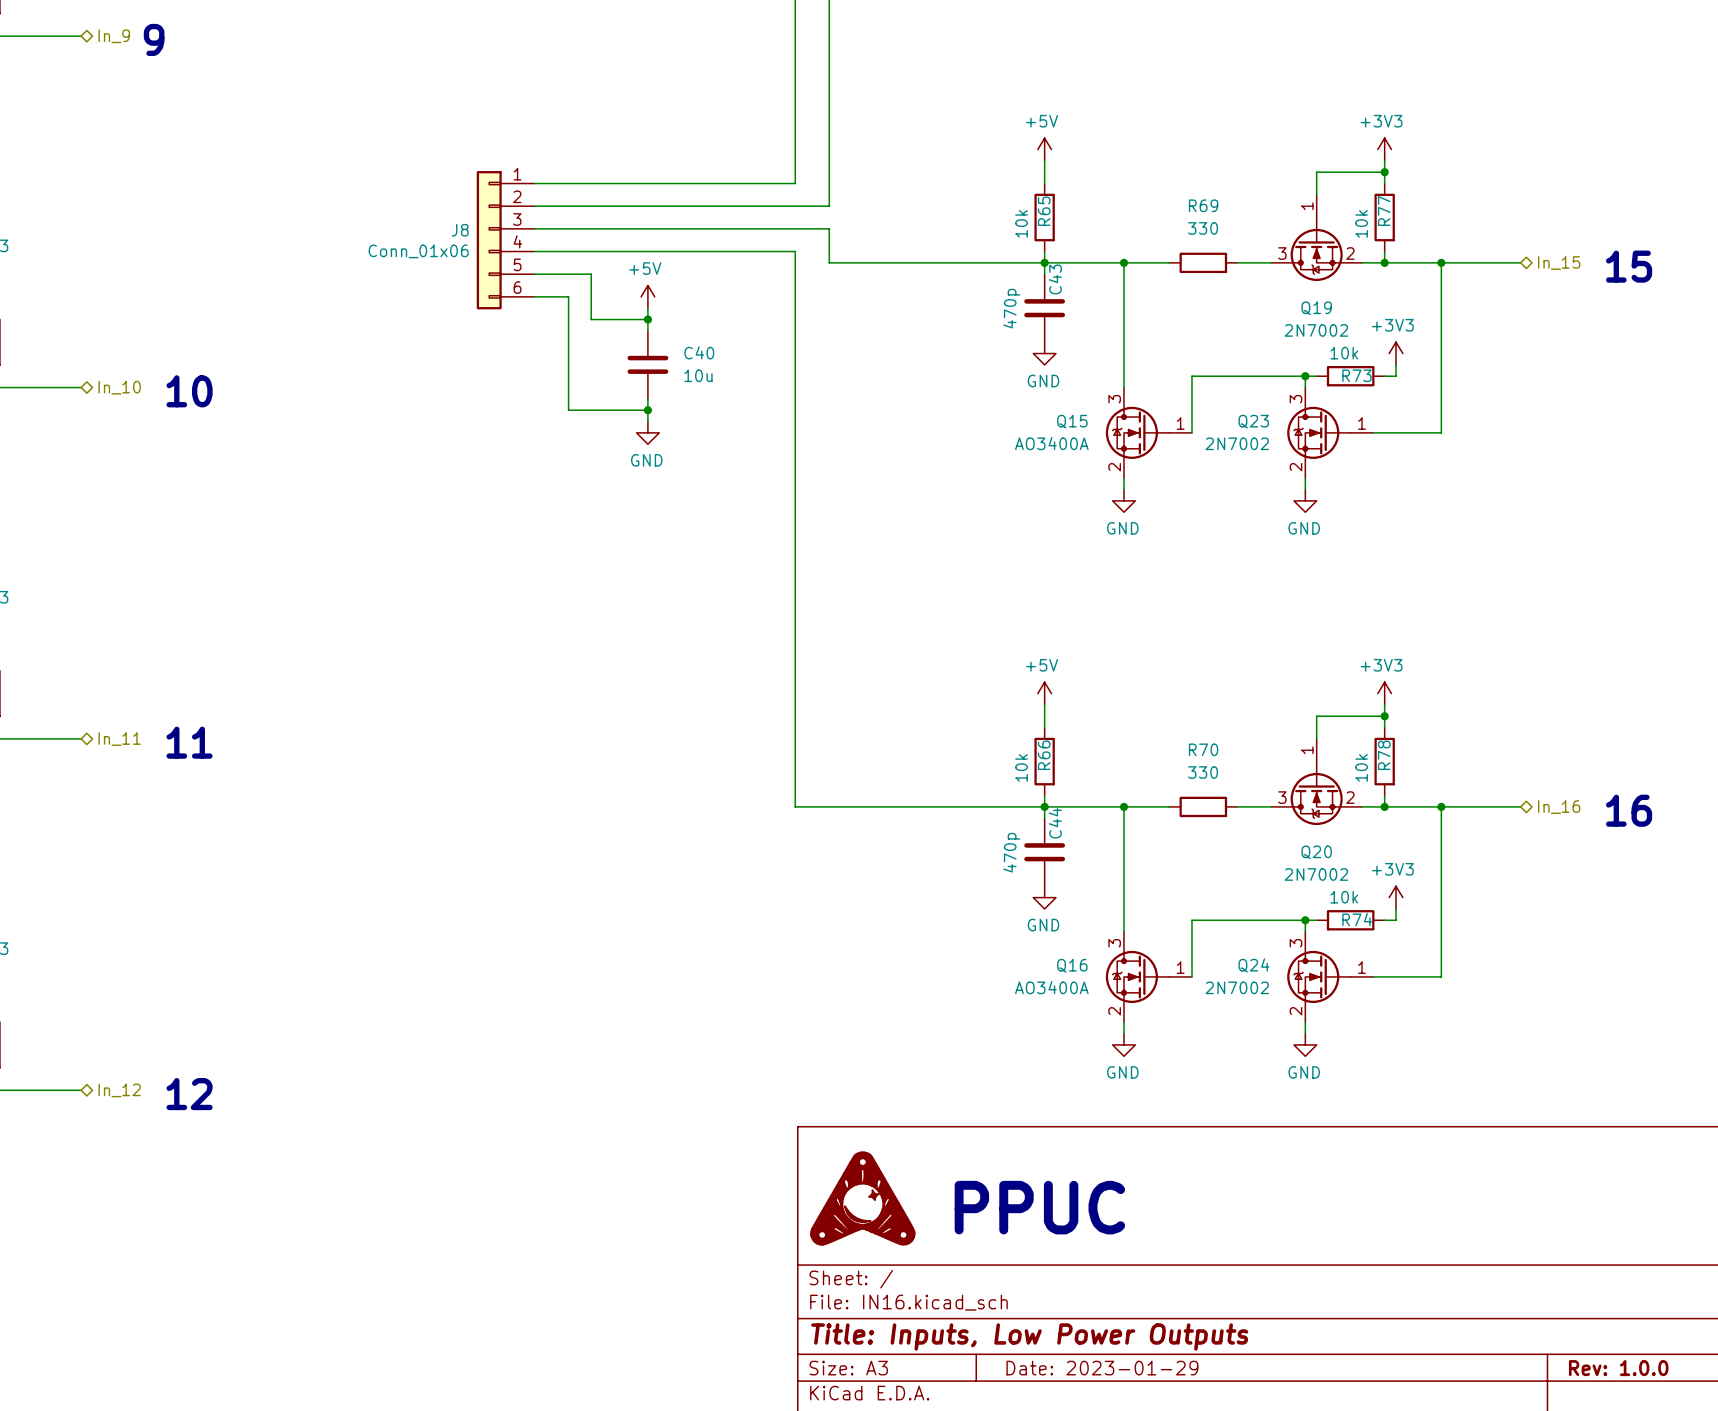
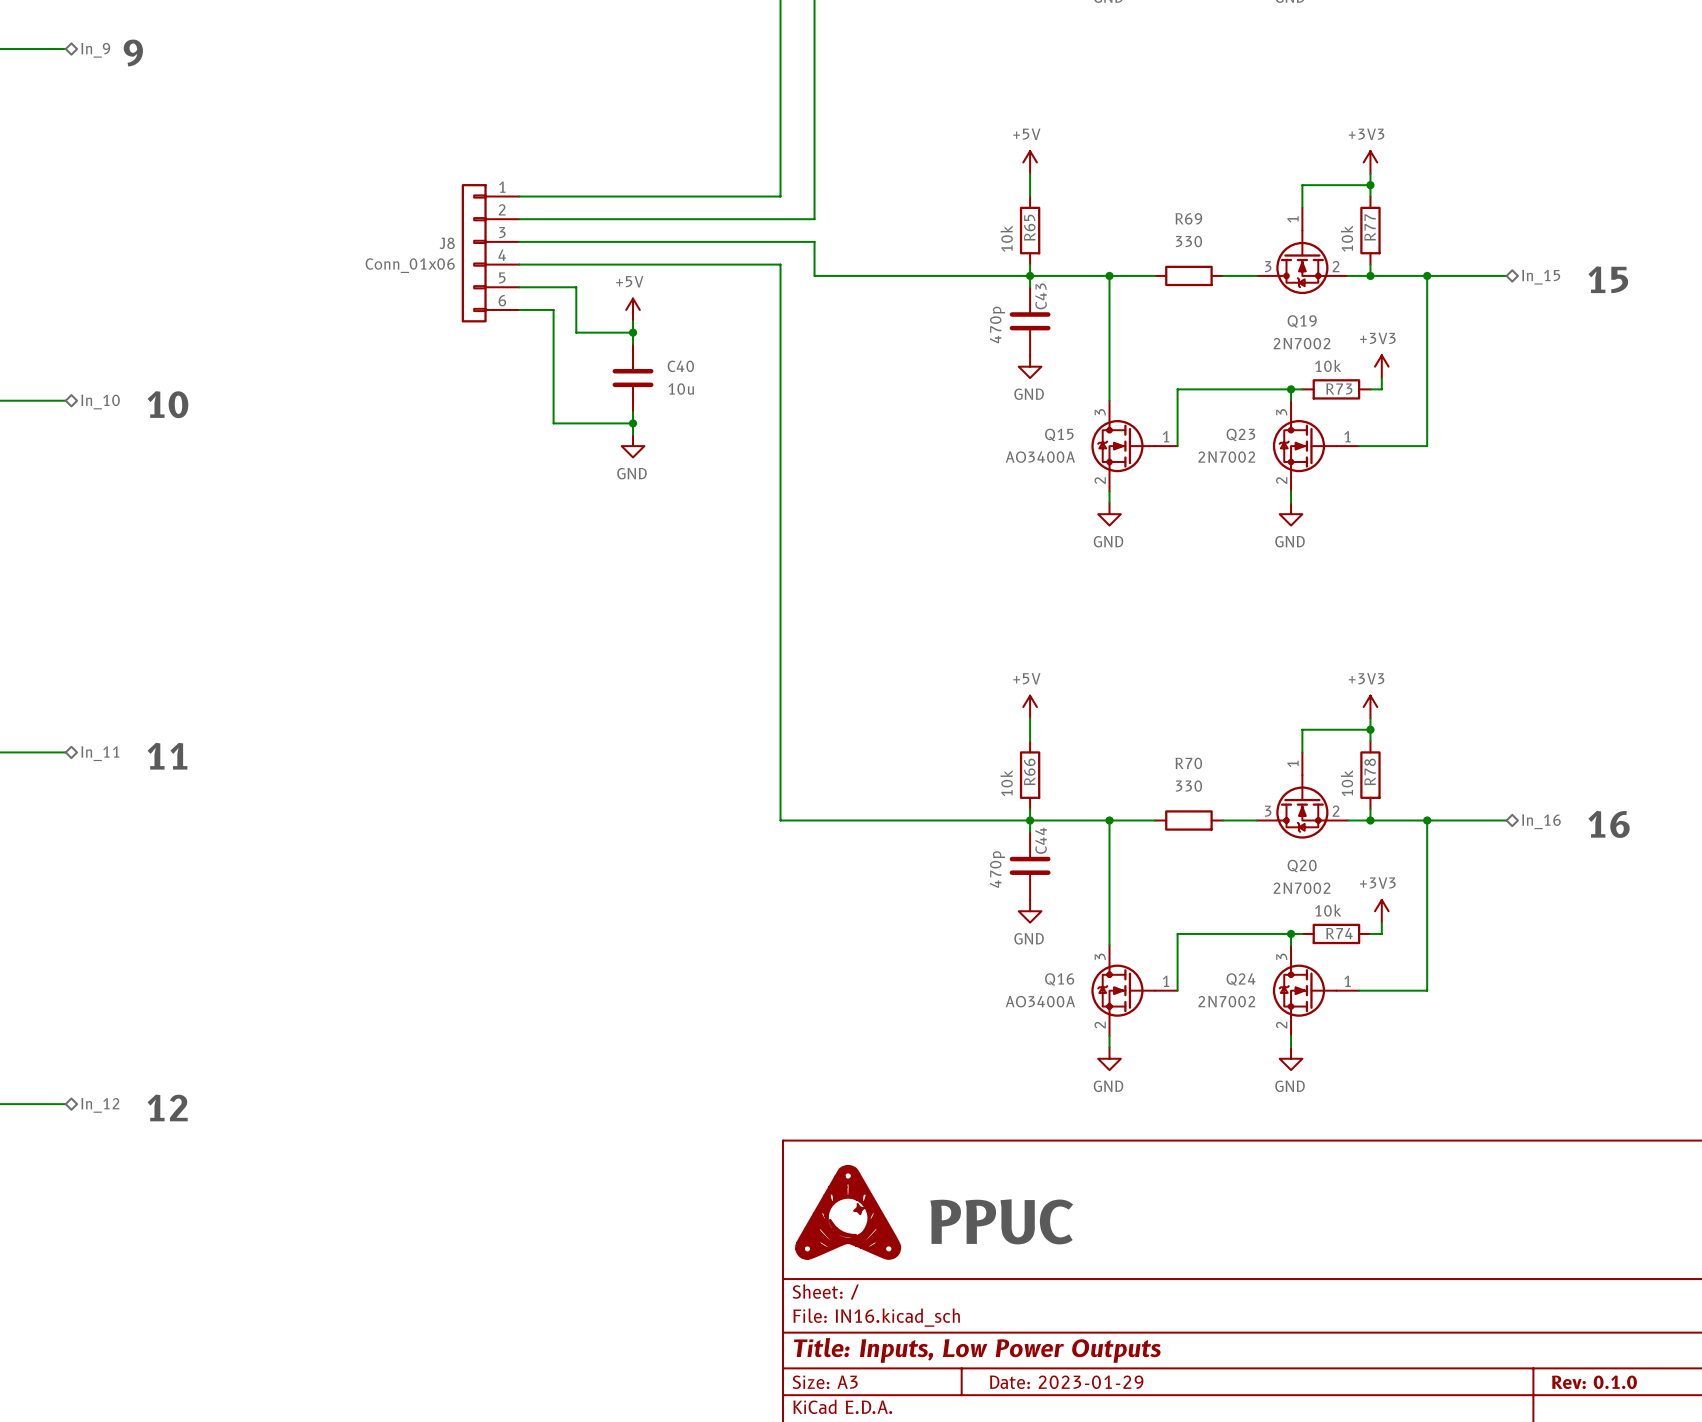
title block: Rev: 1.0.0 (1618, 1368) -> Rev: 0.1.0 (1594, 1382)

